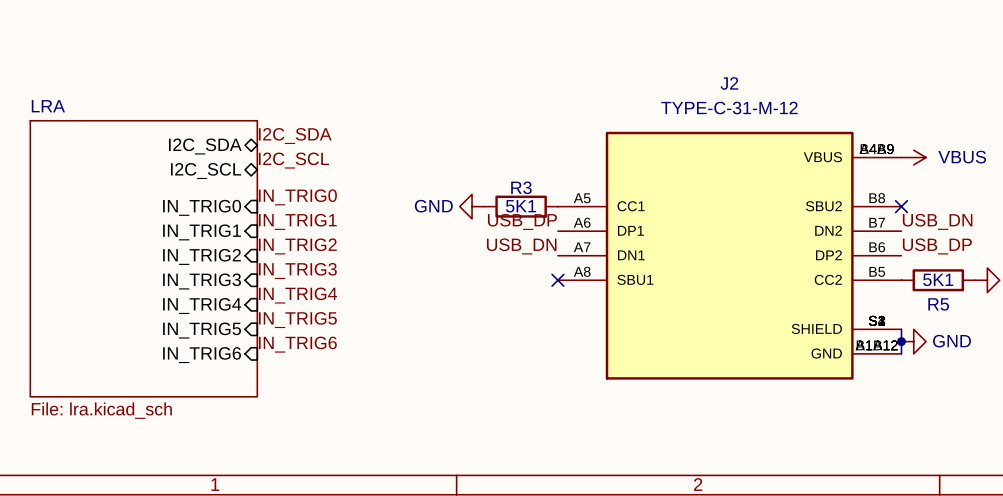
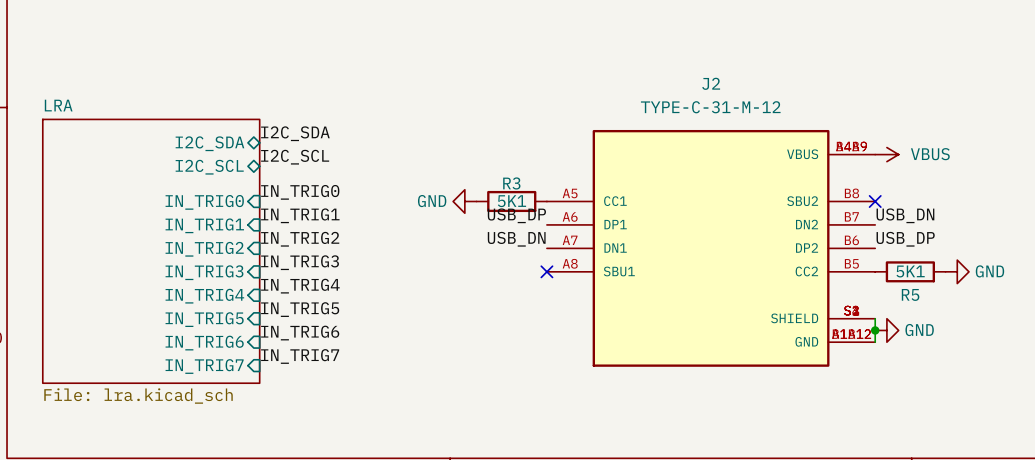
label: none -> IN_TRIG7 (300, 356)
sheet pin: none -> IN_TRIG7 (204, 366)

